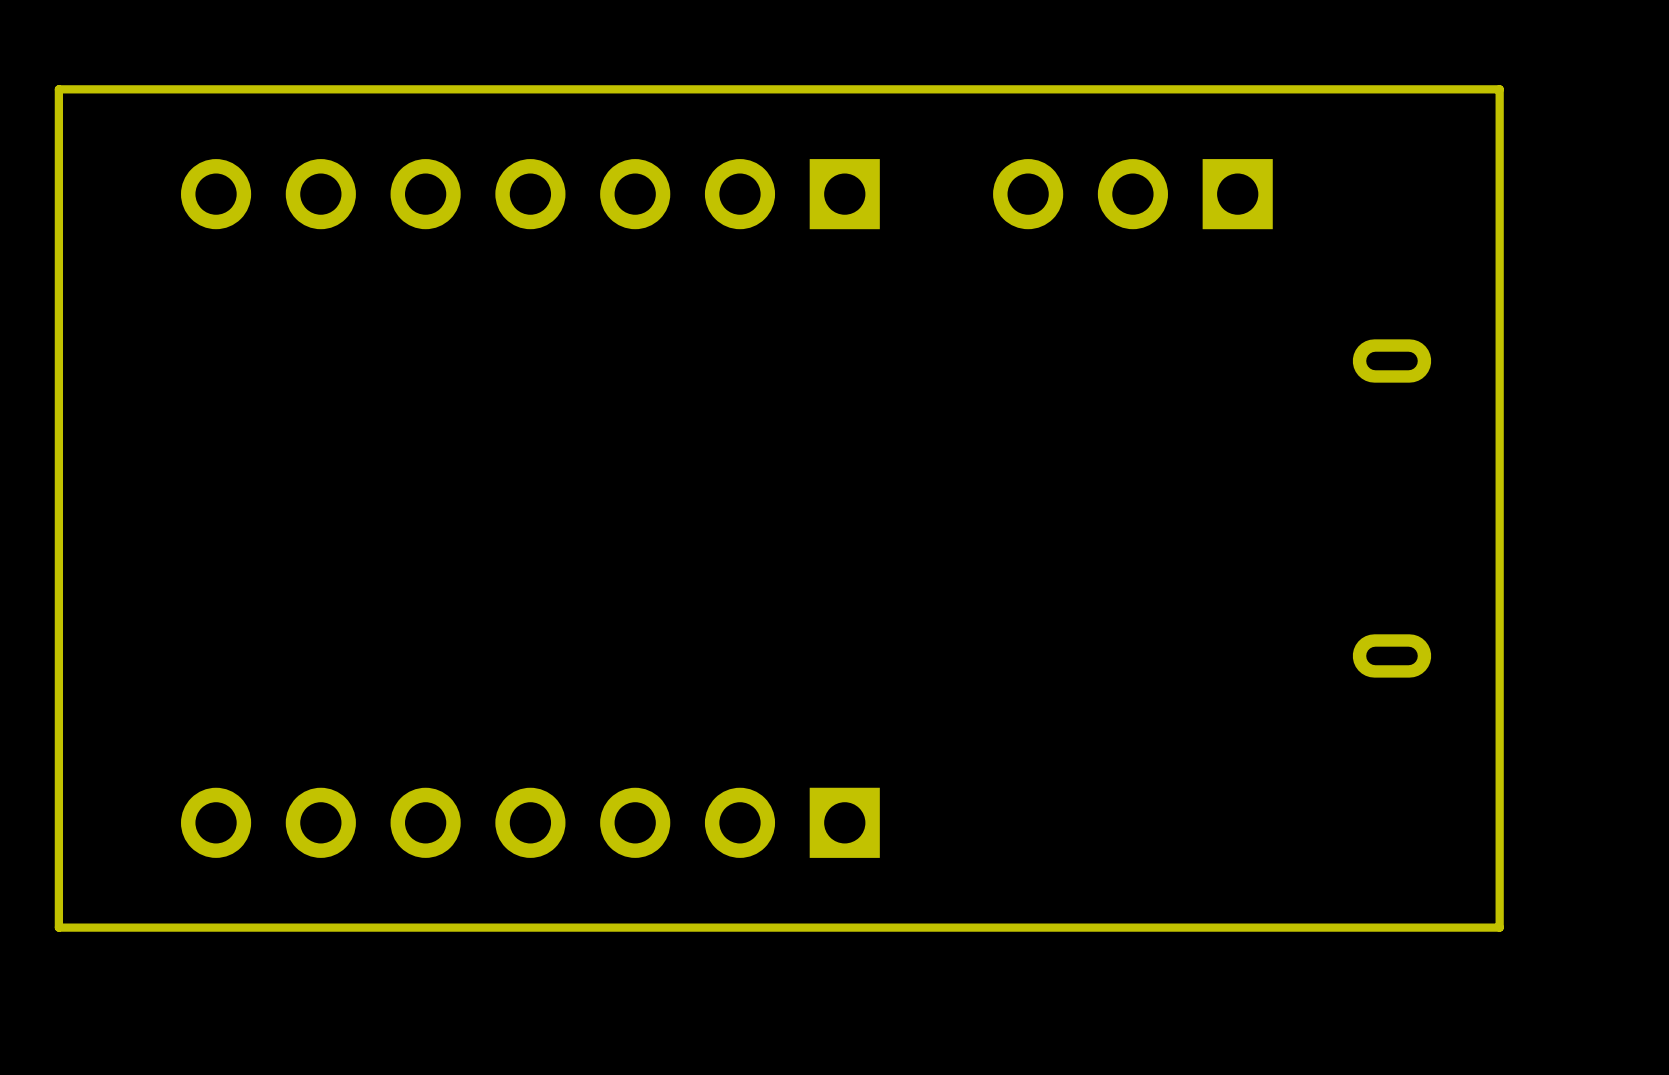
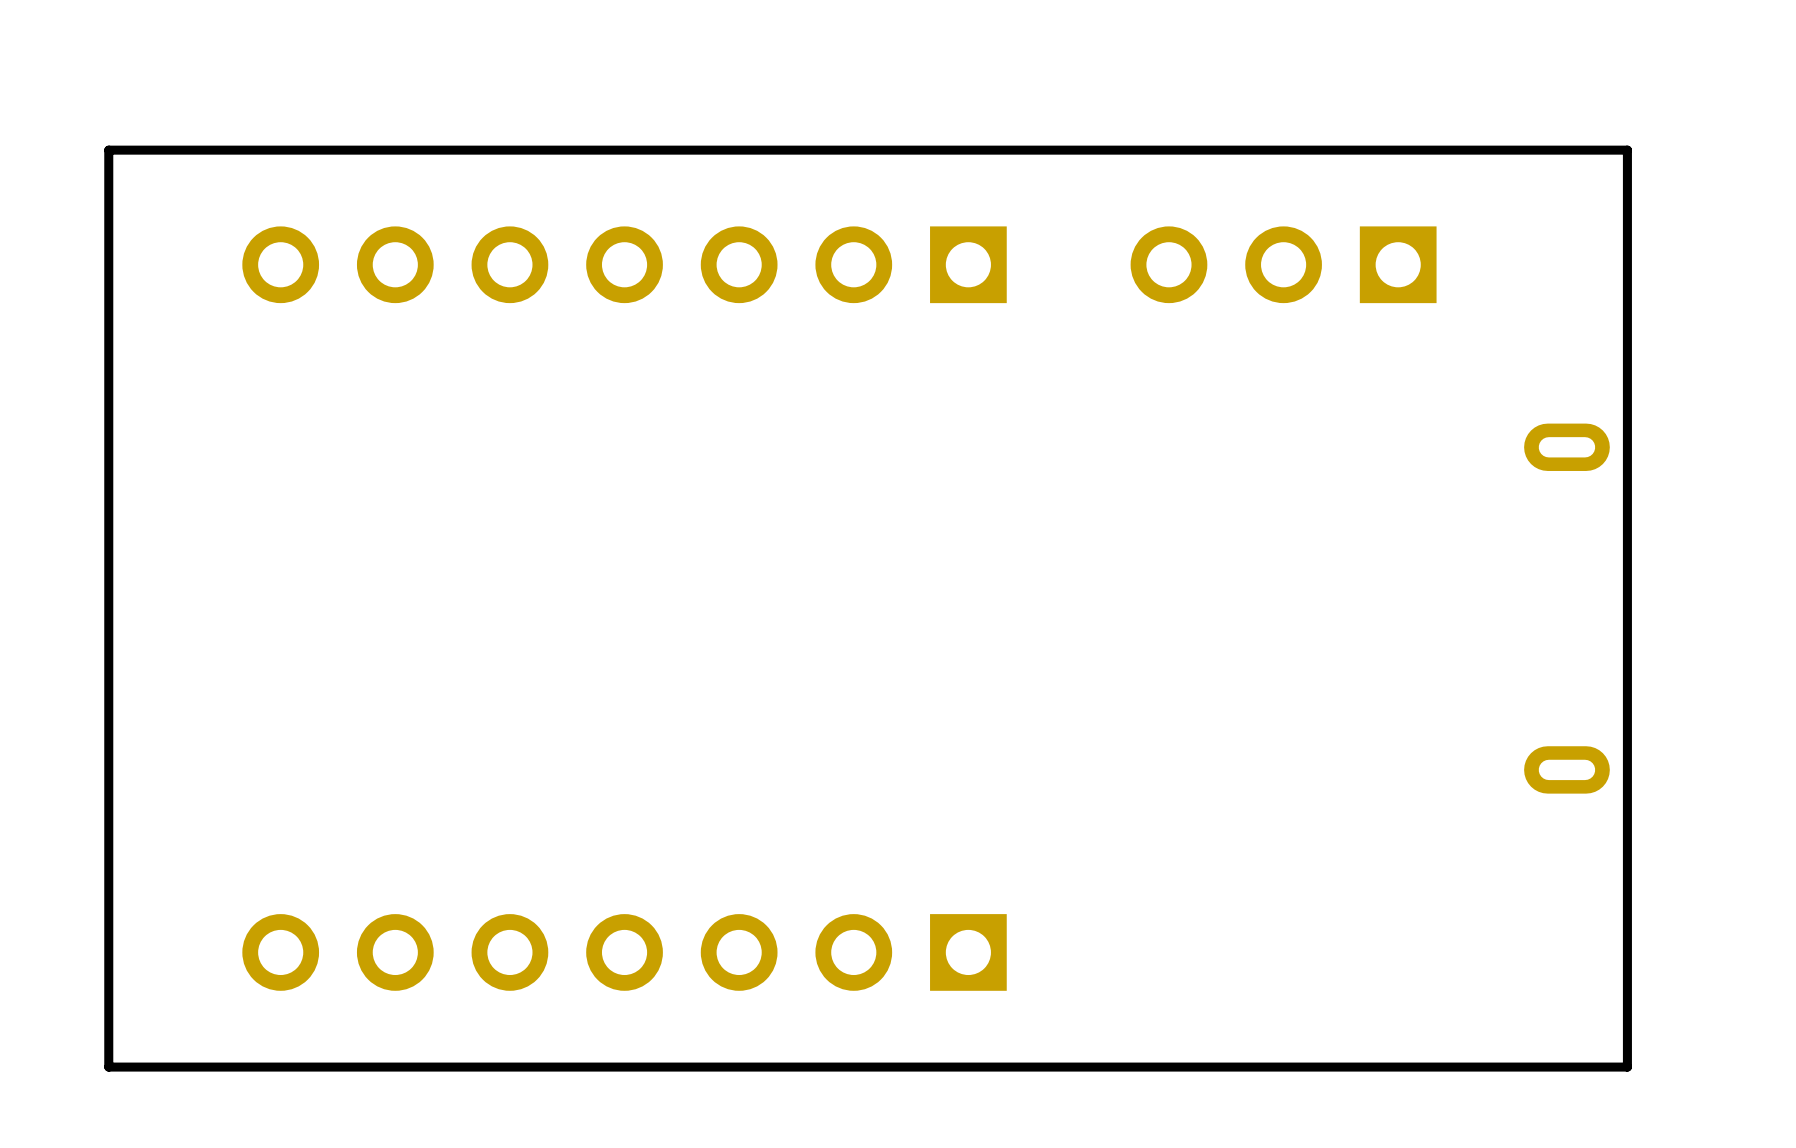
board edge: (1447, 89) (1499, 89) (1499, 927) (1447, 927) -> (1627, 150) (1627, 1067)

